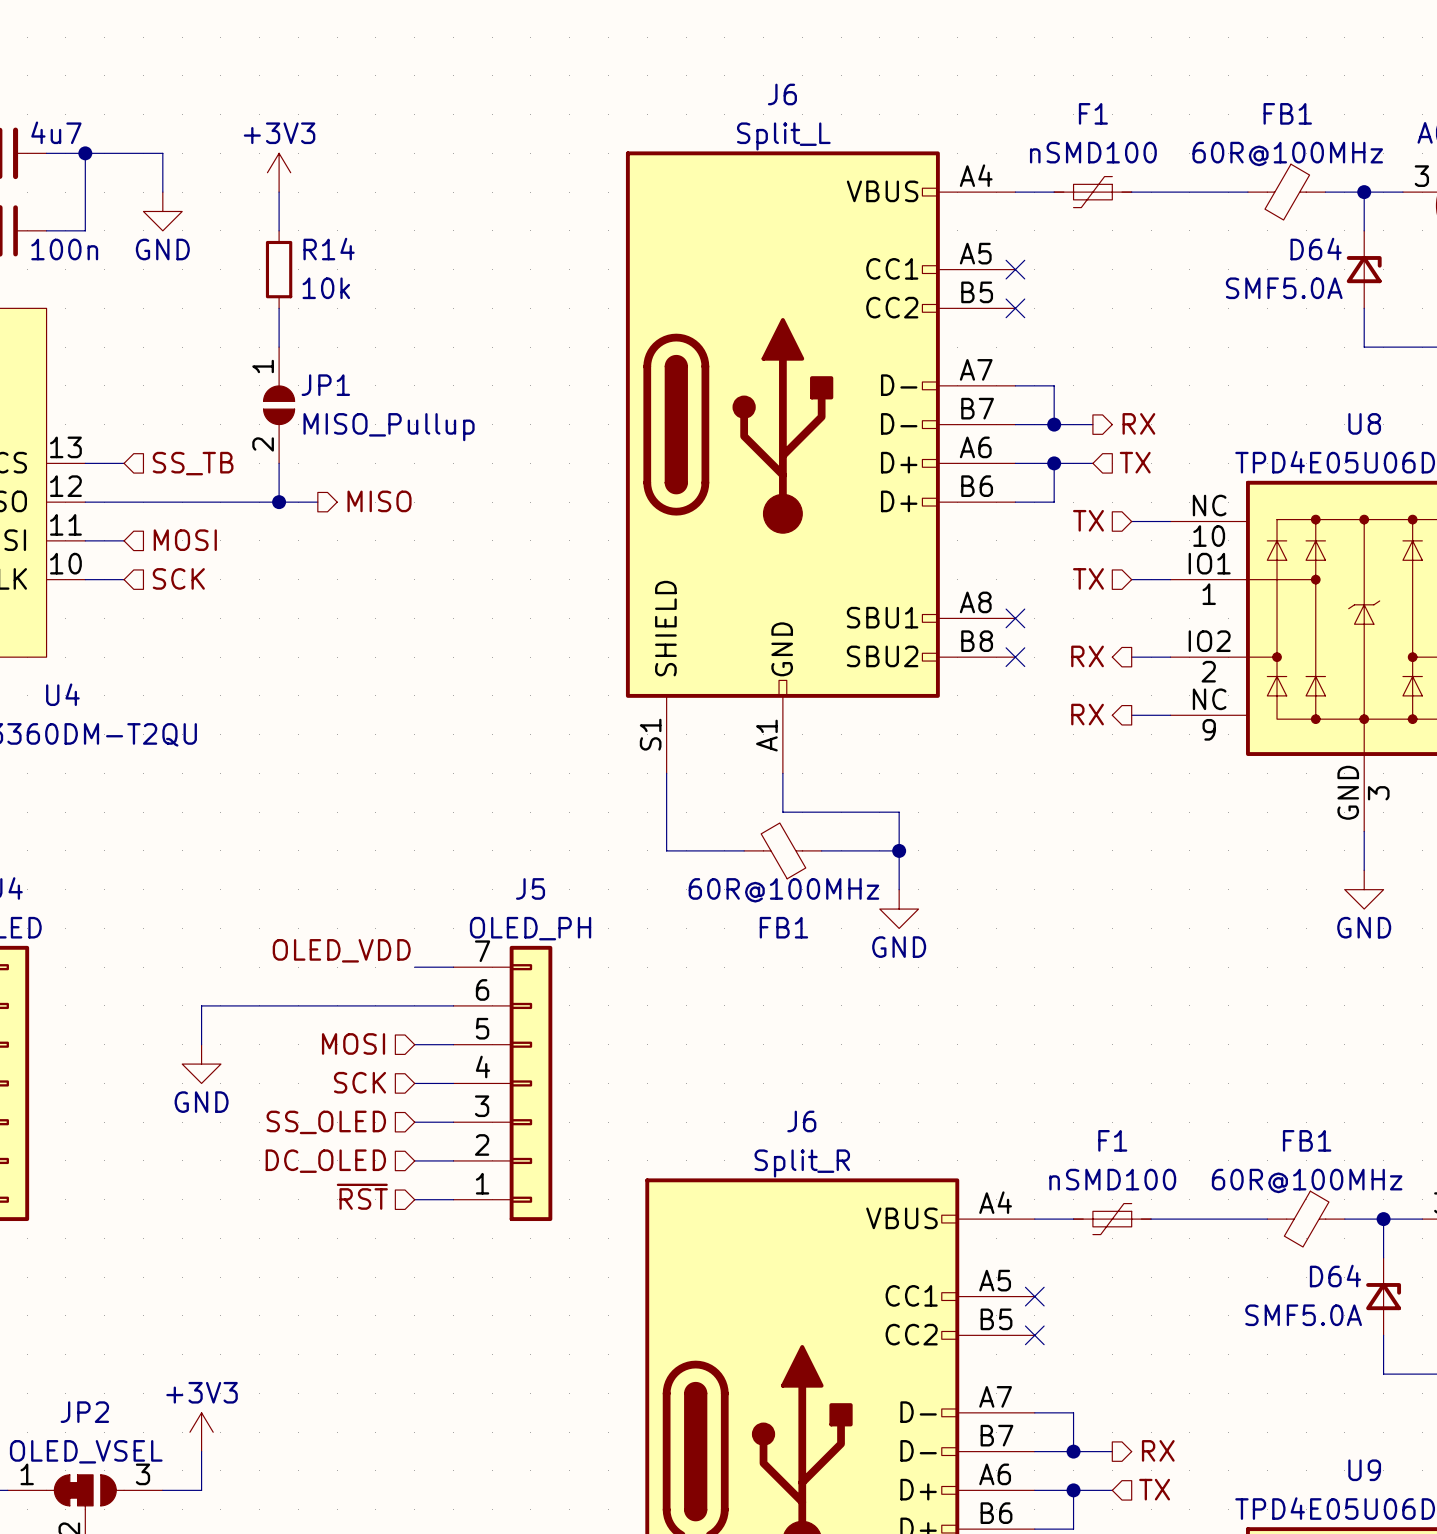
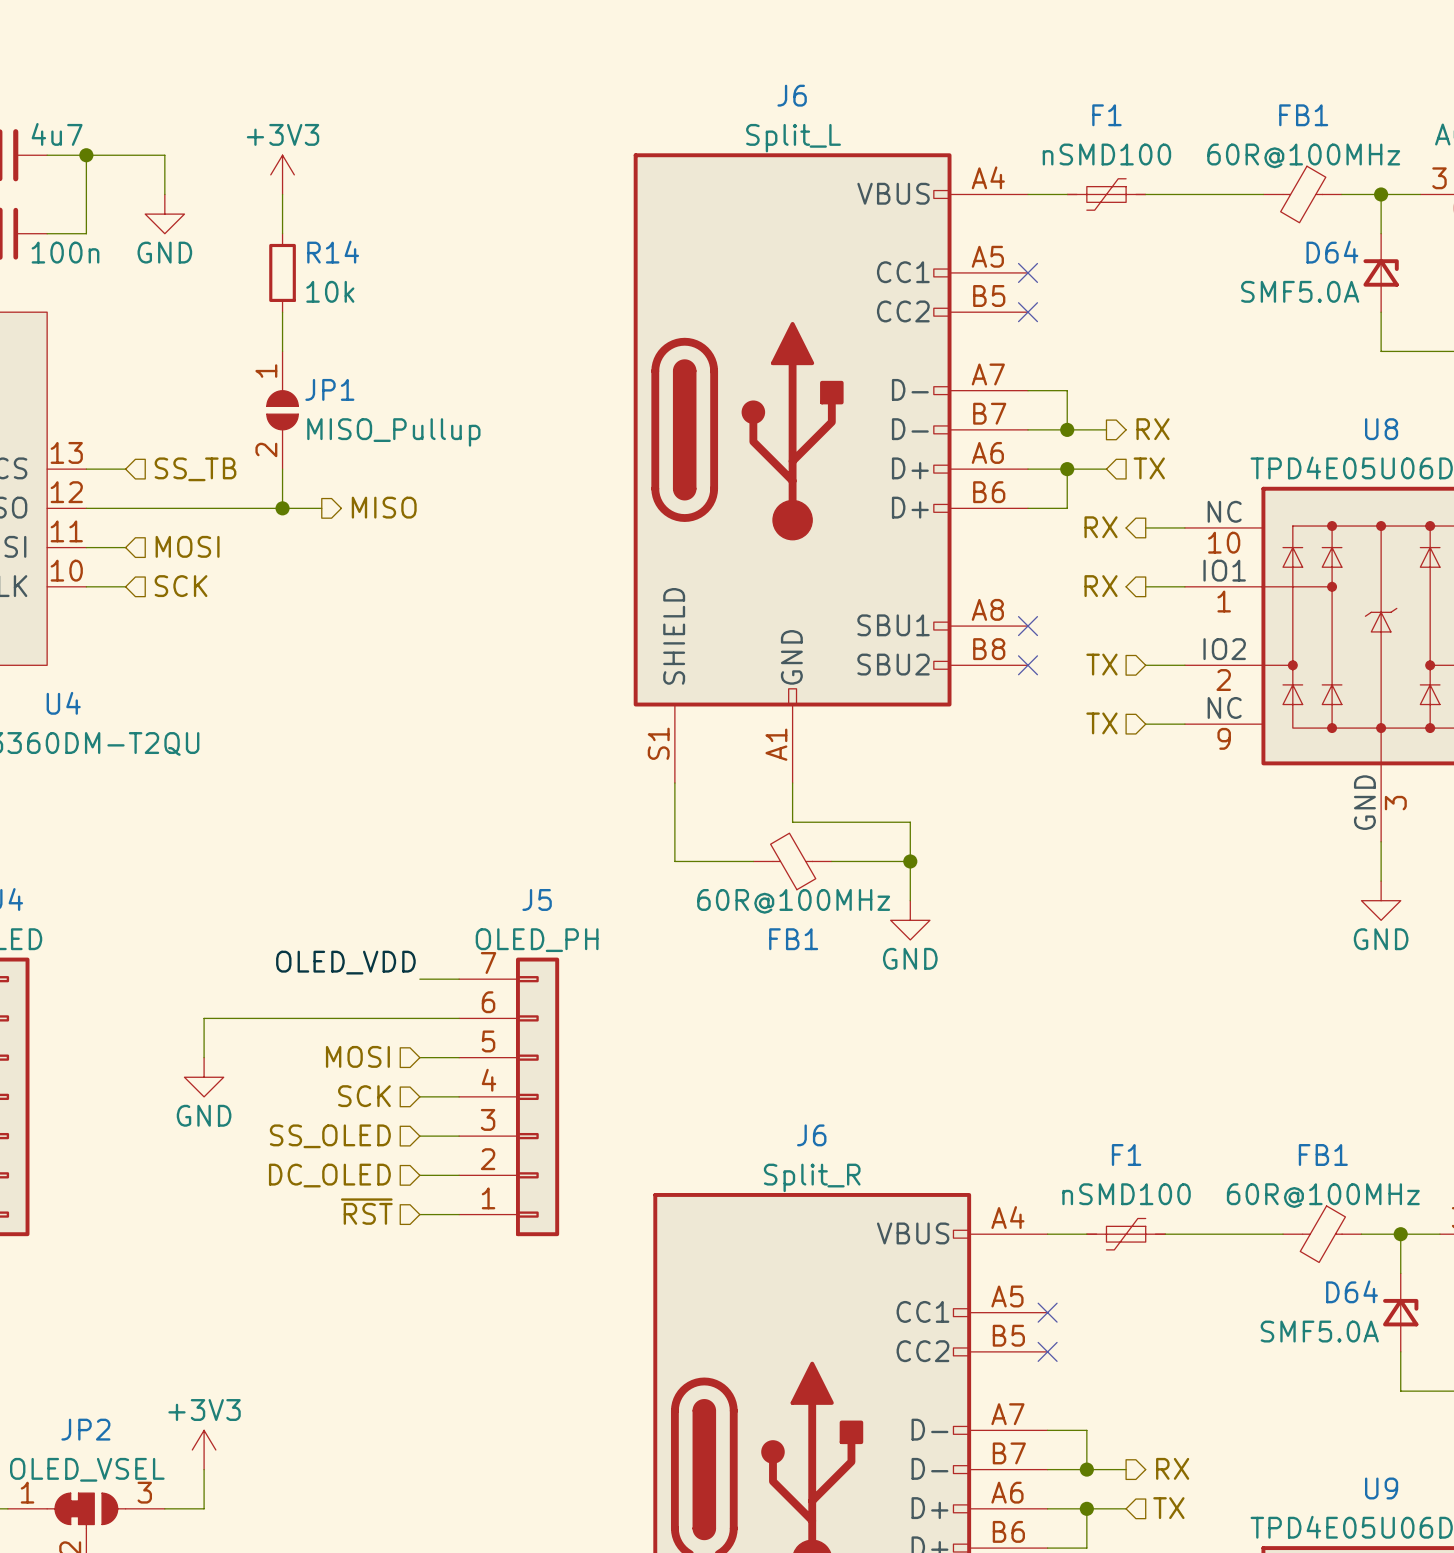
hierarchical label shape: input (1088, 520) -> output (1101, 527)
hierarchical label: TX (1088, 520) -> RX (1101, 527)
hierarchical label shape: input (1088, 578) -> output (1101, 586)
hierarchical label: TX (1088, 578) -> RX (1101, 586)
hierarchical label shape: output (1087, 656) -> input (1101, 664)
hierarchical label: RX (1087, 656) -> TX (1101, 664)
hierarchical label shape: output (1087, 714) -> input (1101, 723)
hierarchical label: RX (1087, 714) -> TX (1101, 723)

